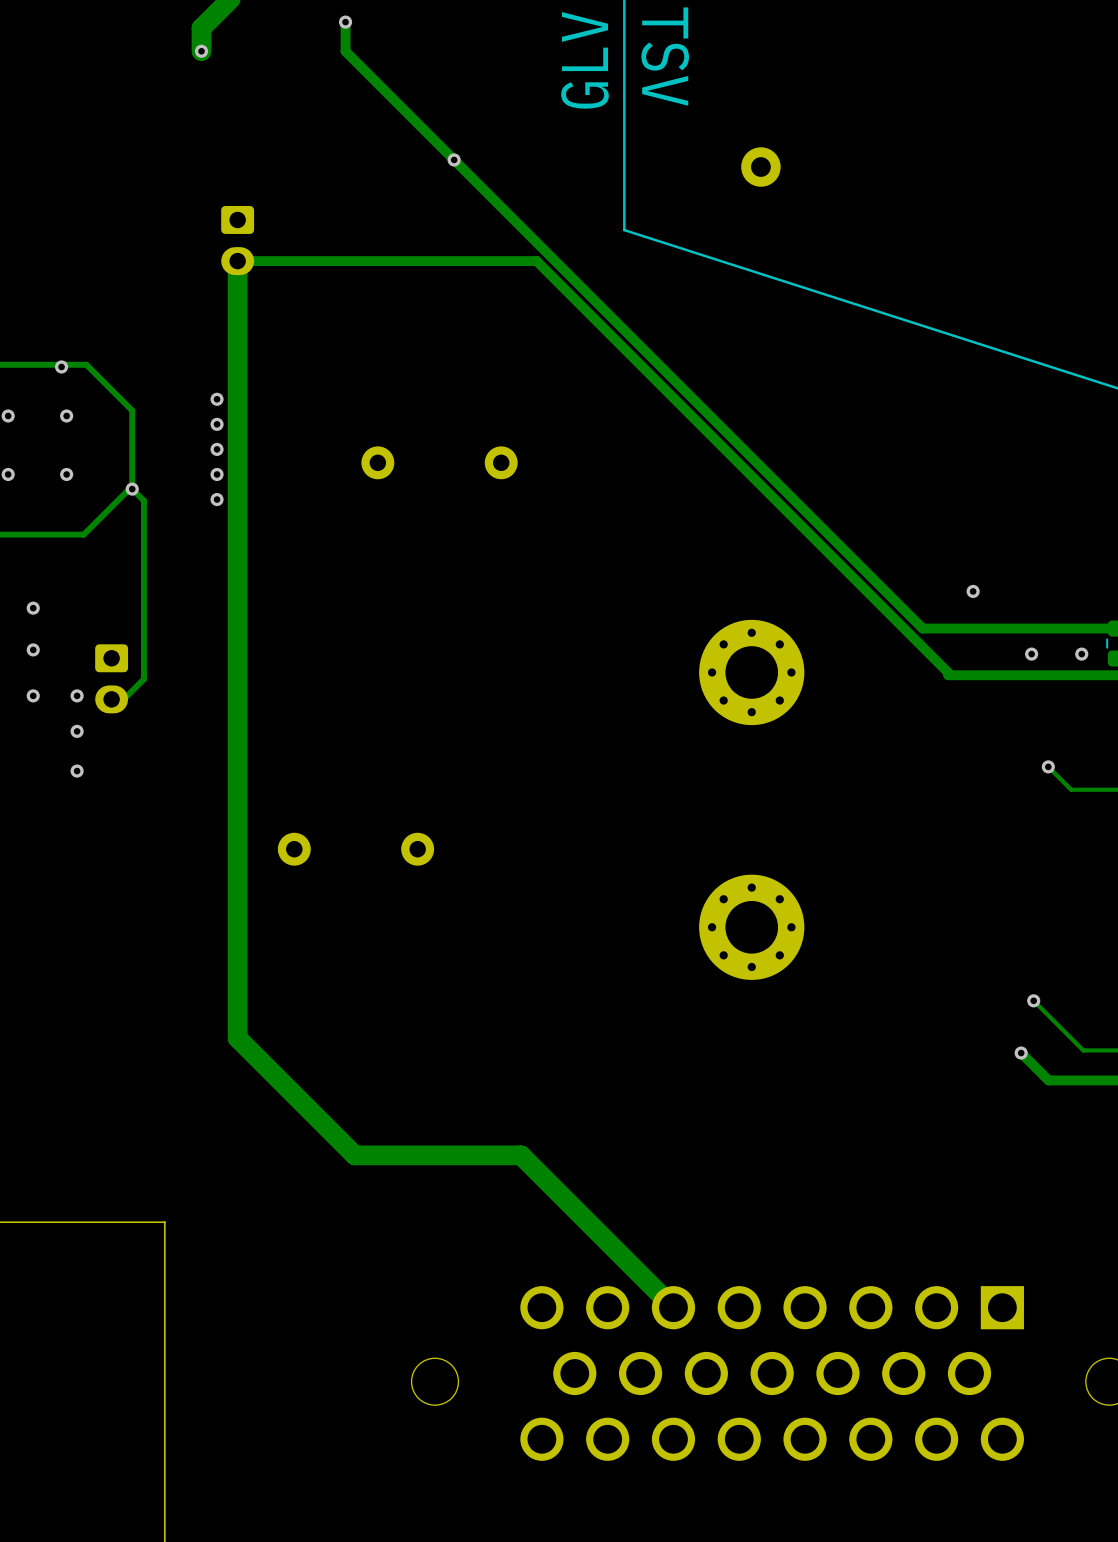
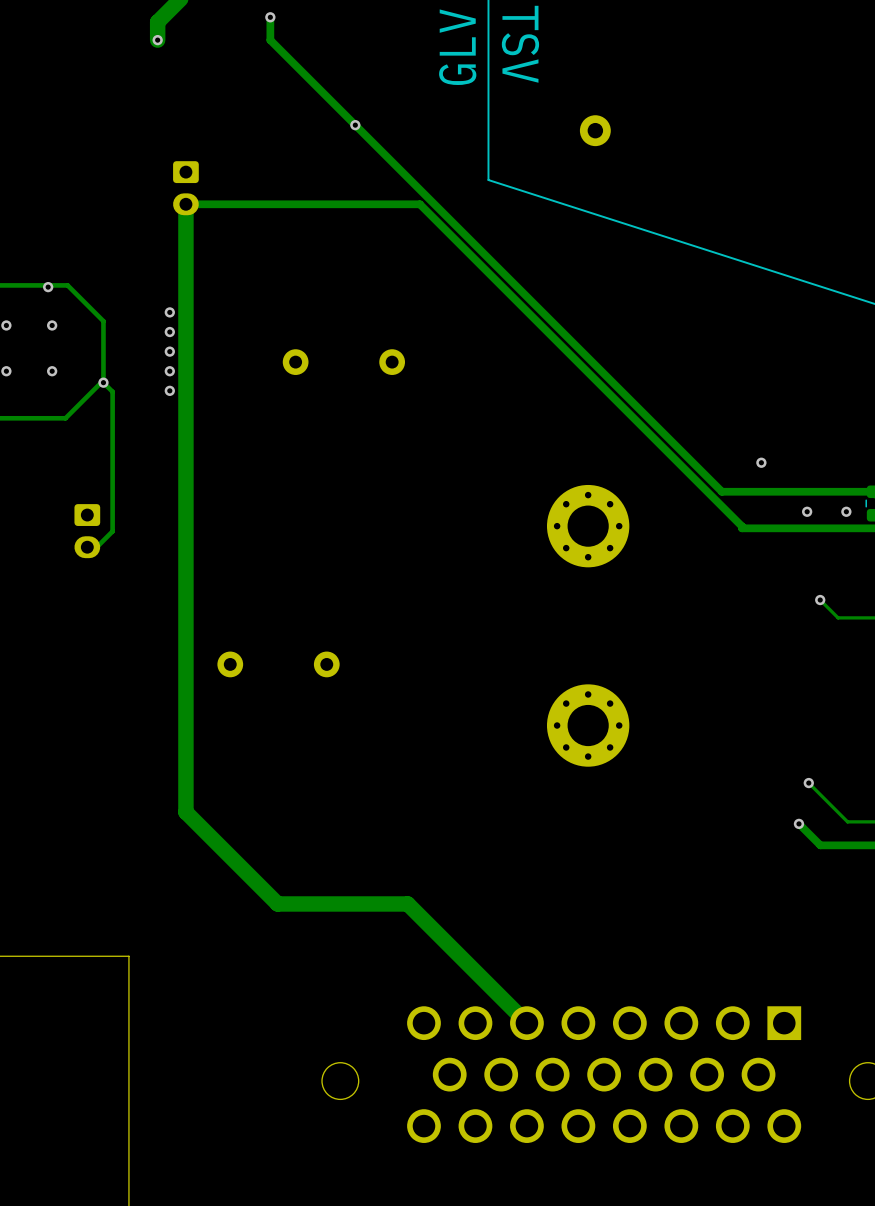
via: (33, 608) -> none
via: (33, 649) -> none
via: (33, 695) -> none
via: (77, 695) -> none
via: (77, 731) -> none
via: (77, 771) -> none

